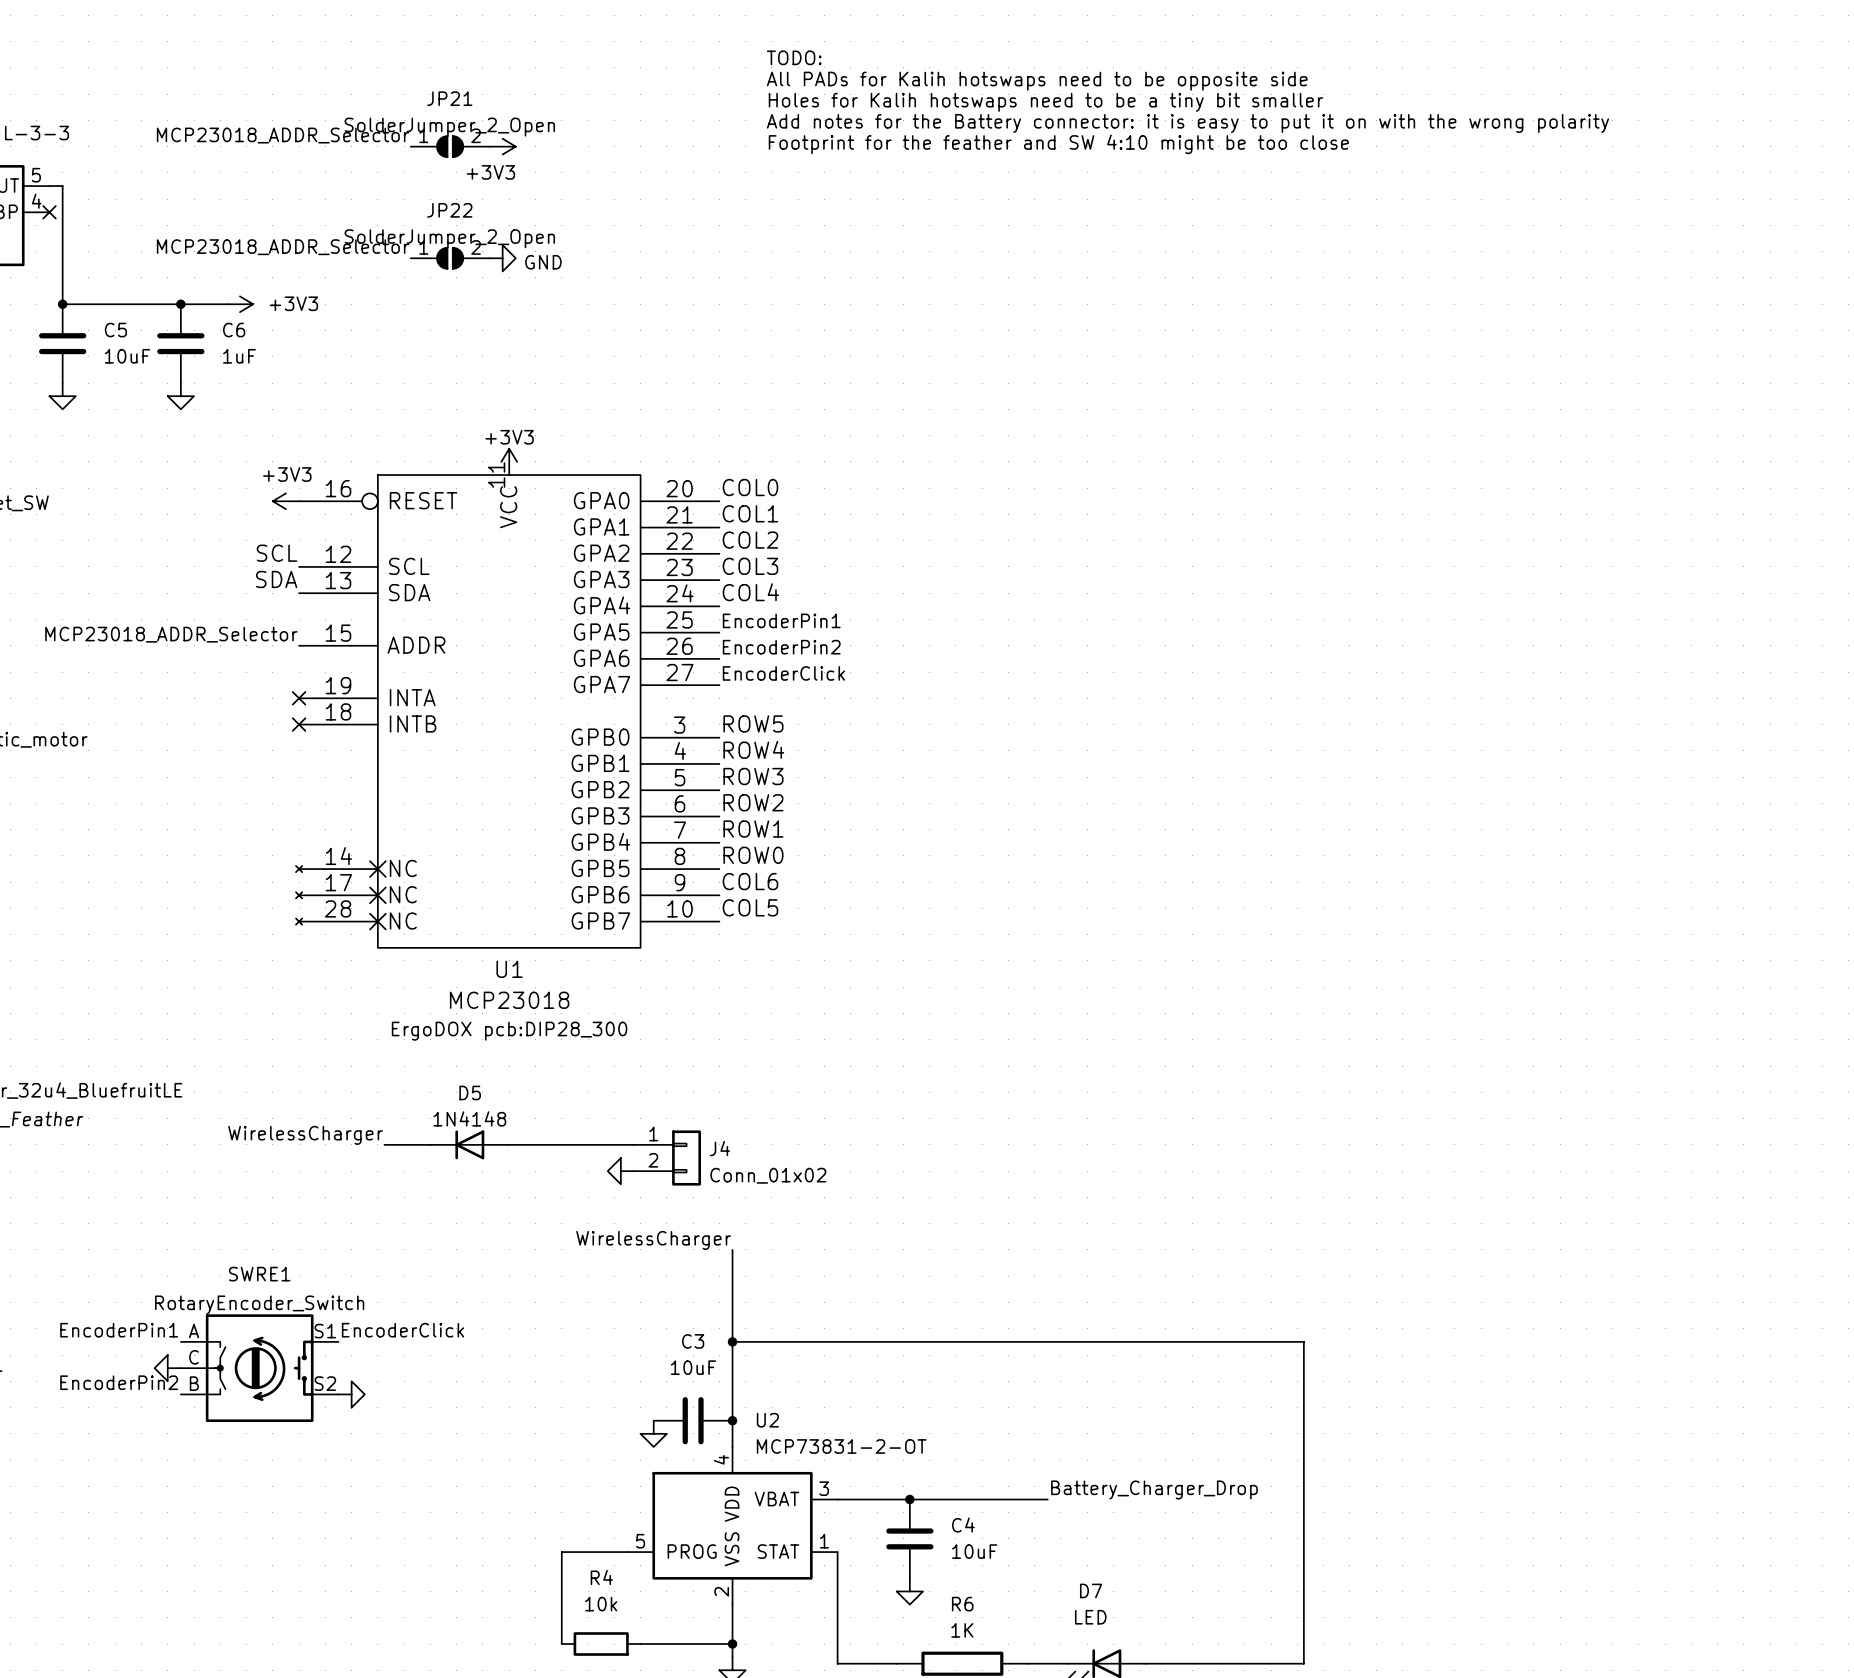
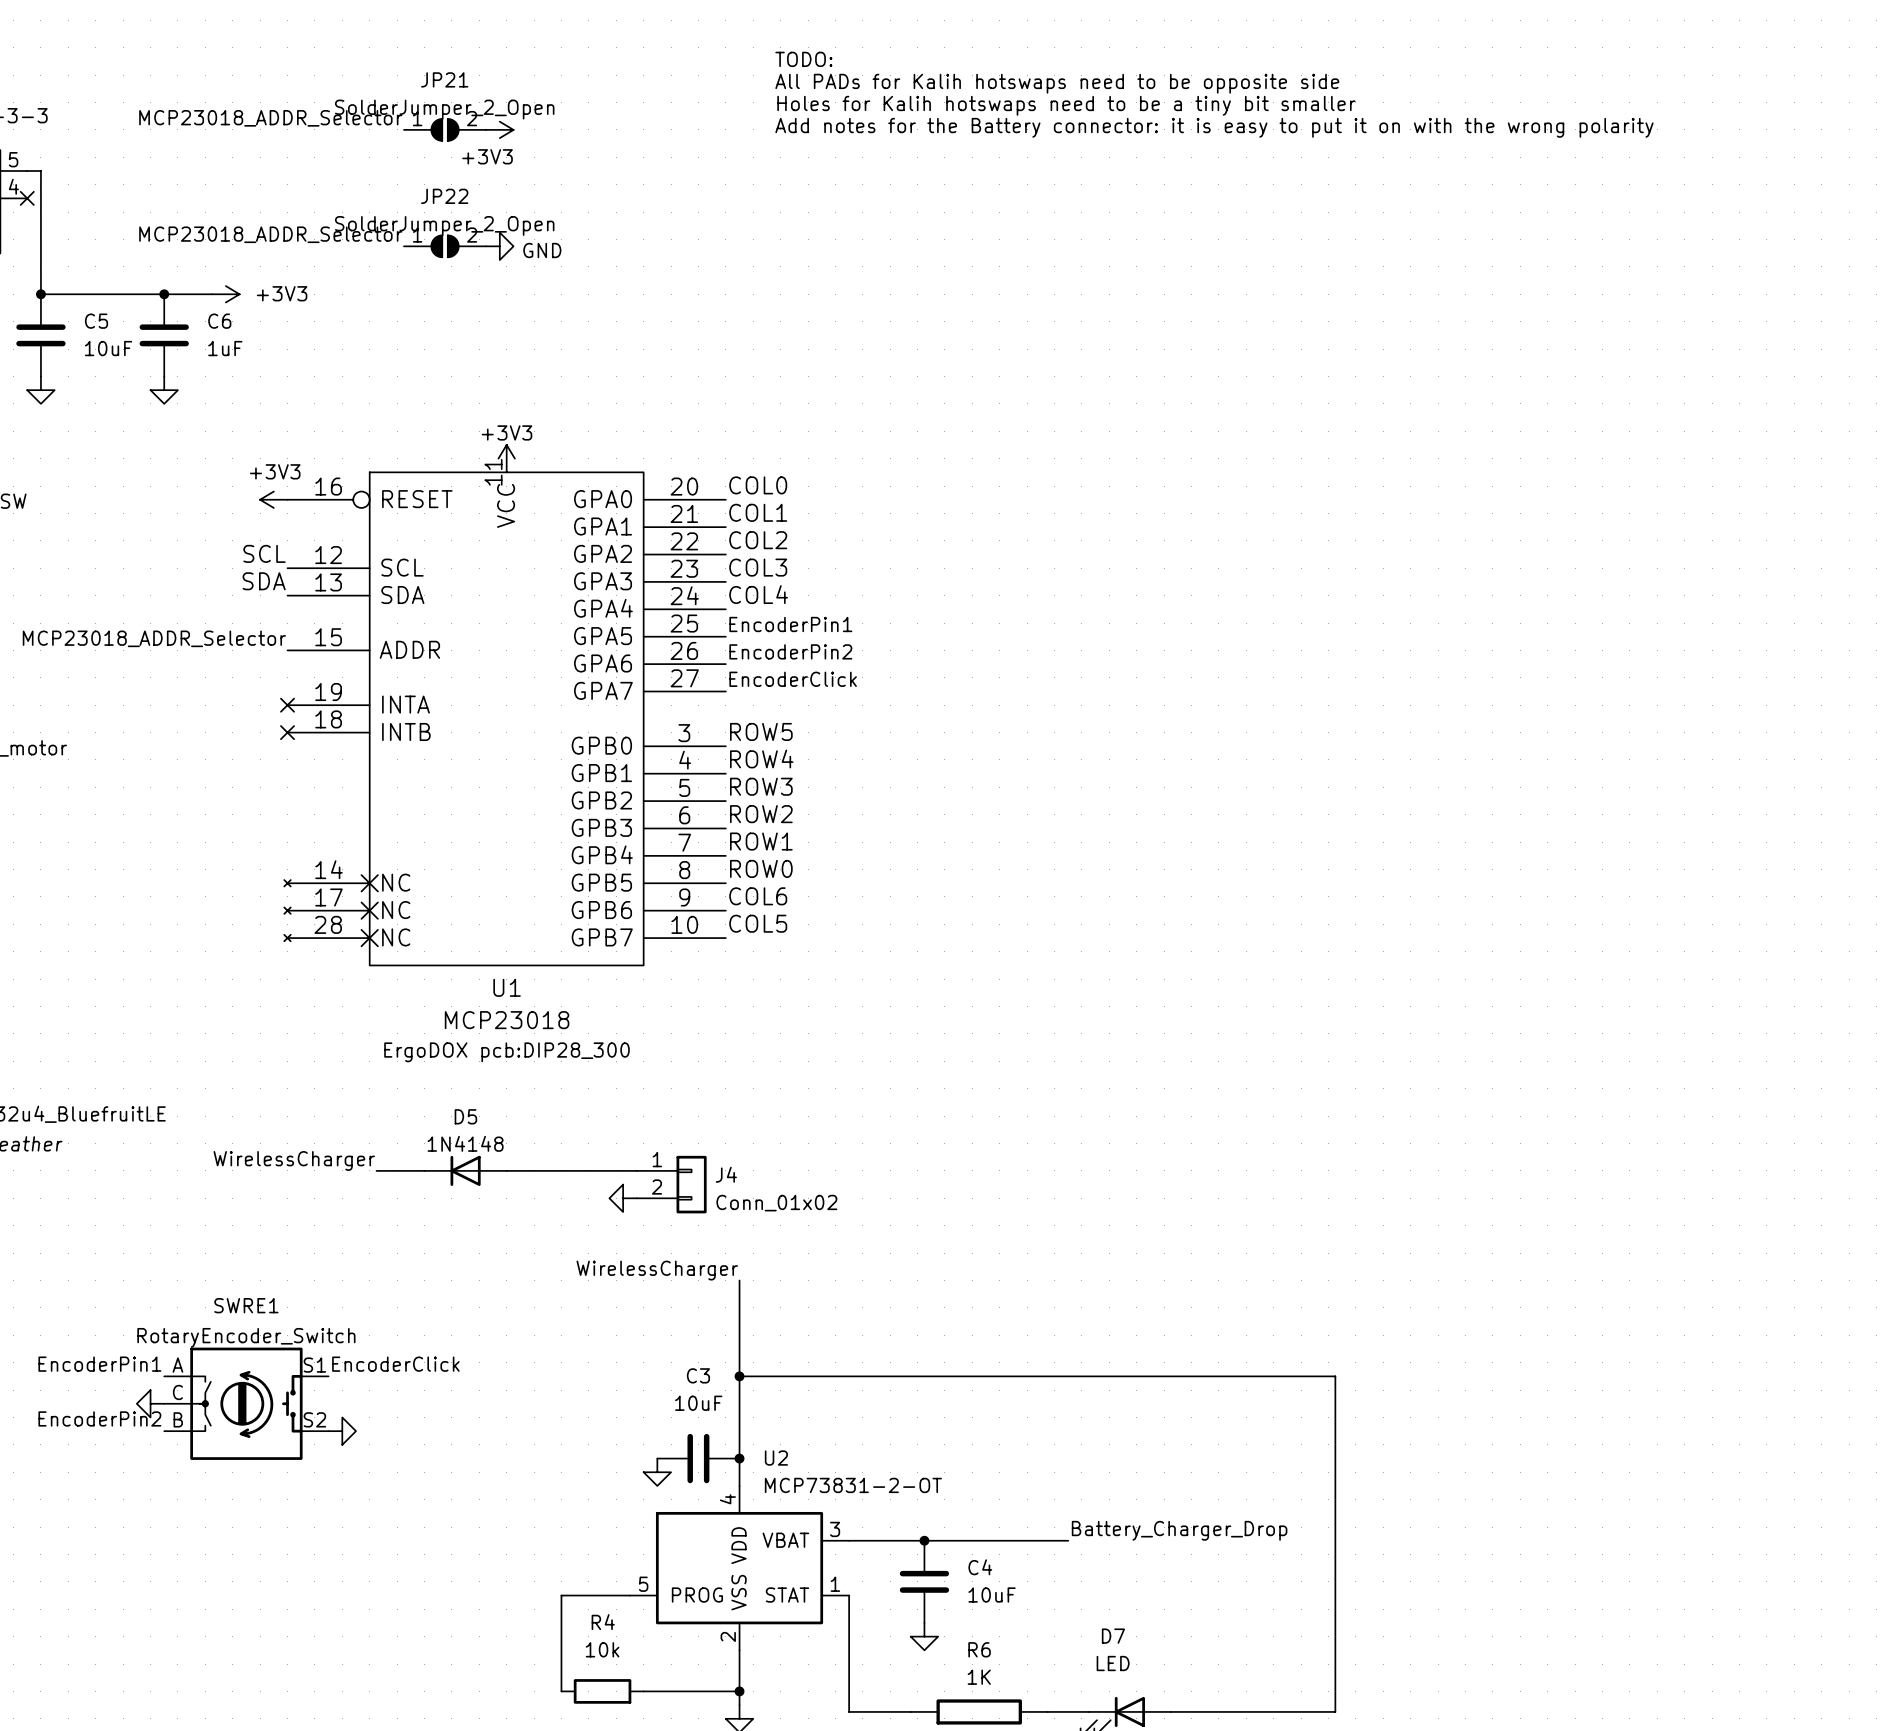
text: TODO: (794, 57) -> none
text: All PADs for Kalih hotswaps need to be opposite side (1037, 81) -> TODO: (803, 59)
text: Holes for Kalih hotswaps need to be a tiny bit smaller (1045, 102) -> All PADs for Kalih hotswaps need to be opposite side (1057, 83)
text: Add notes for the Battery connector: it is easy to put it on with the wrong polarity (1187, 123) -> Holes for Kalih hotswaps need to be a tiny bit smaller (1066, 105)
text: Footprint for the feather and SW 4:10 might be too close (1058, 144) -> Add notes for the Battery connector: it is easy to put it on with the wrong polarity (1214, 127)

